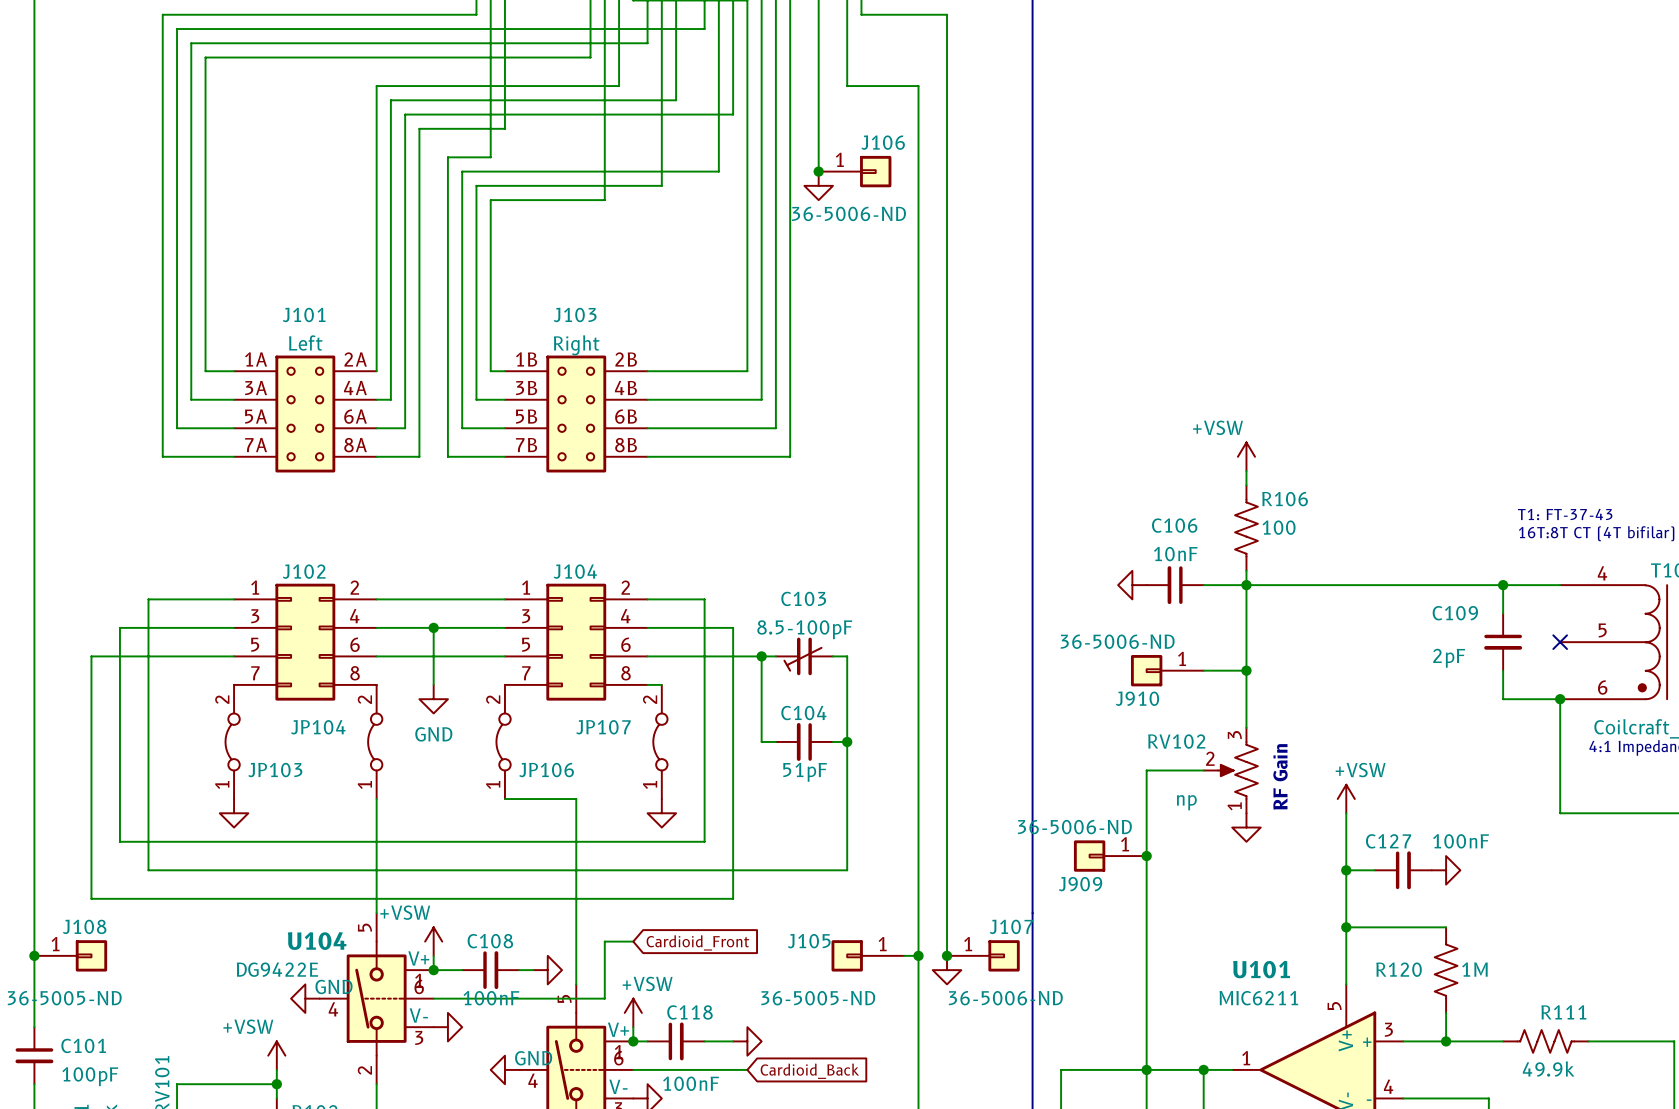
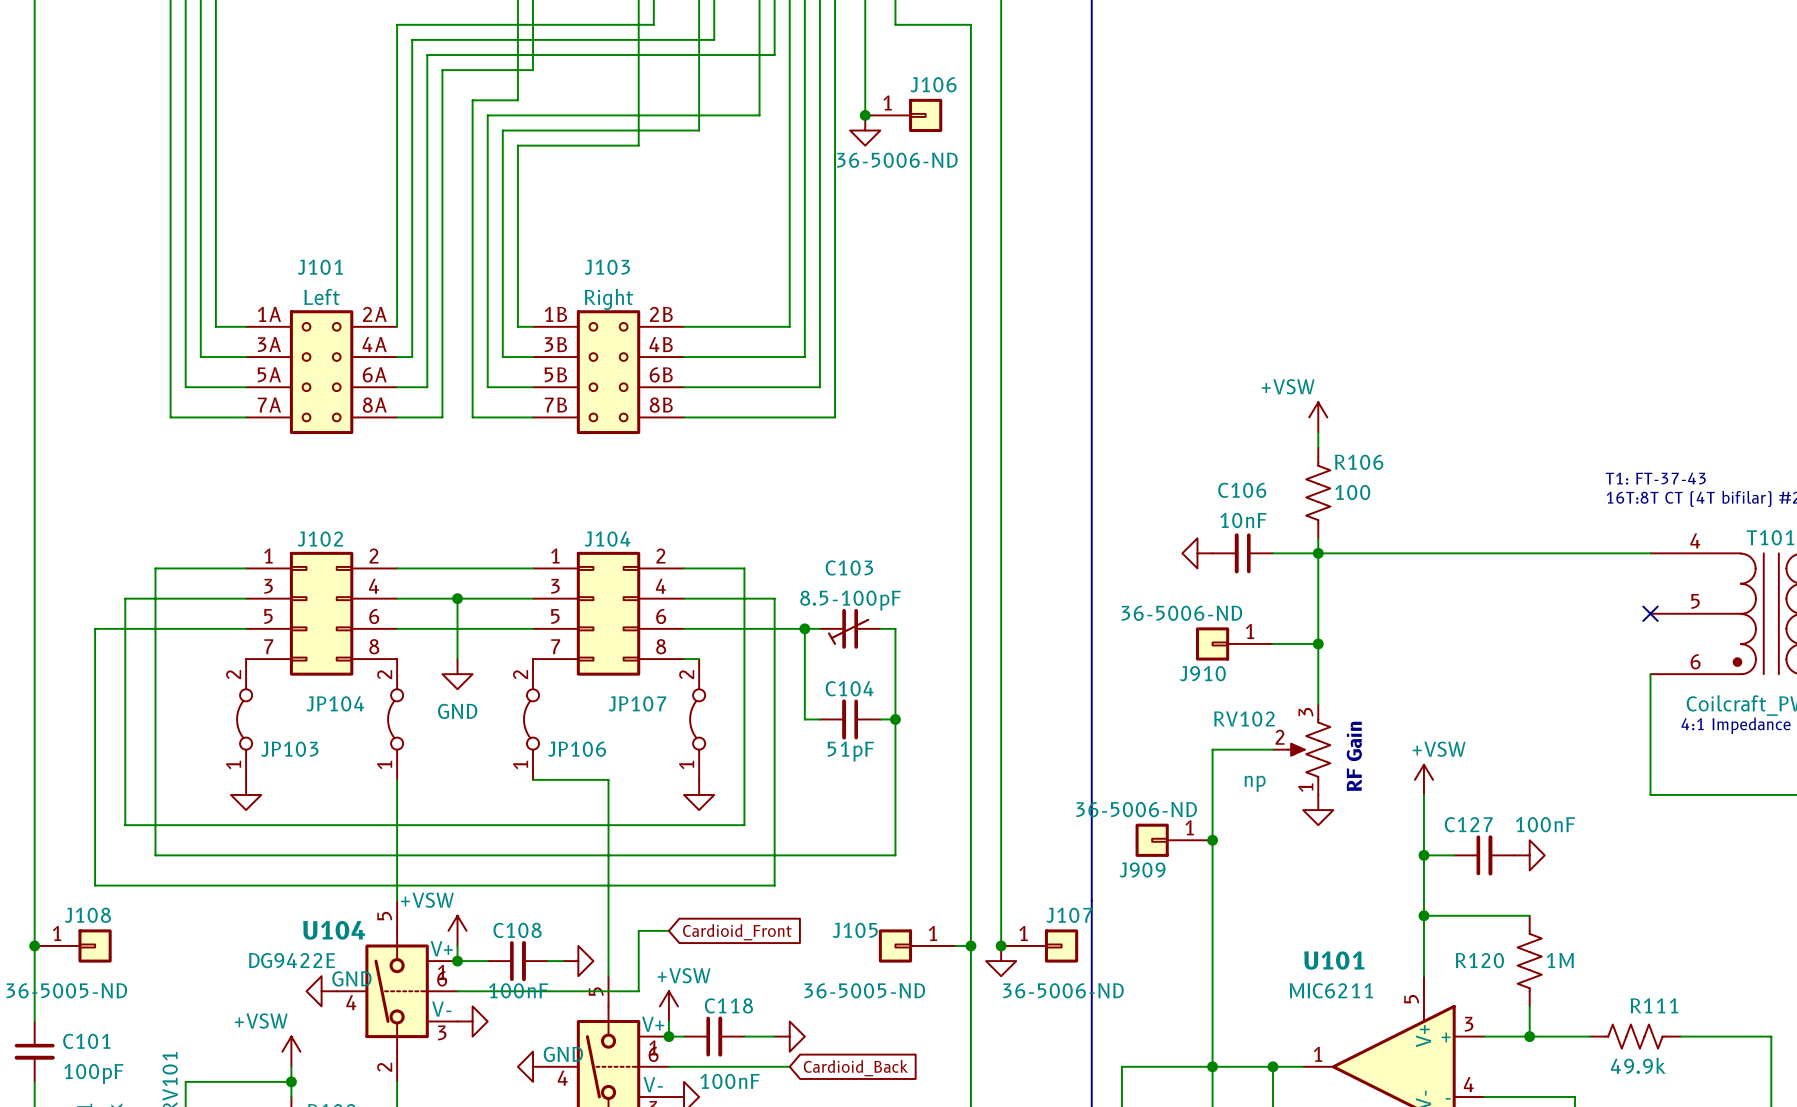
wire: (1503, 585) (1503, 613) -> none
junction: (1503, 585) -> none
C109: 2pF (1503, 642) -> none
wire: (1503, 670) (1503, 699) (1560, 699) -> none
junction: (1560, 699) -> none

